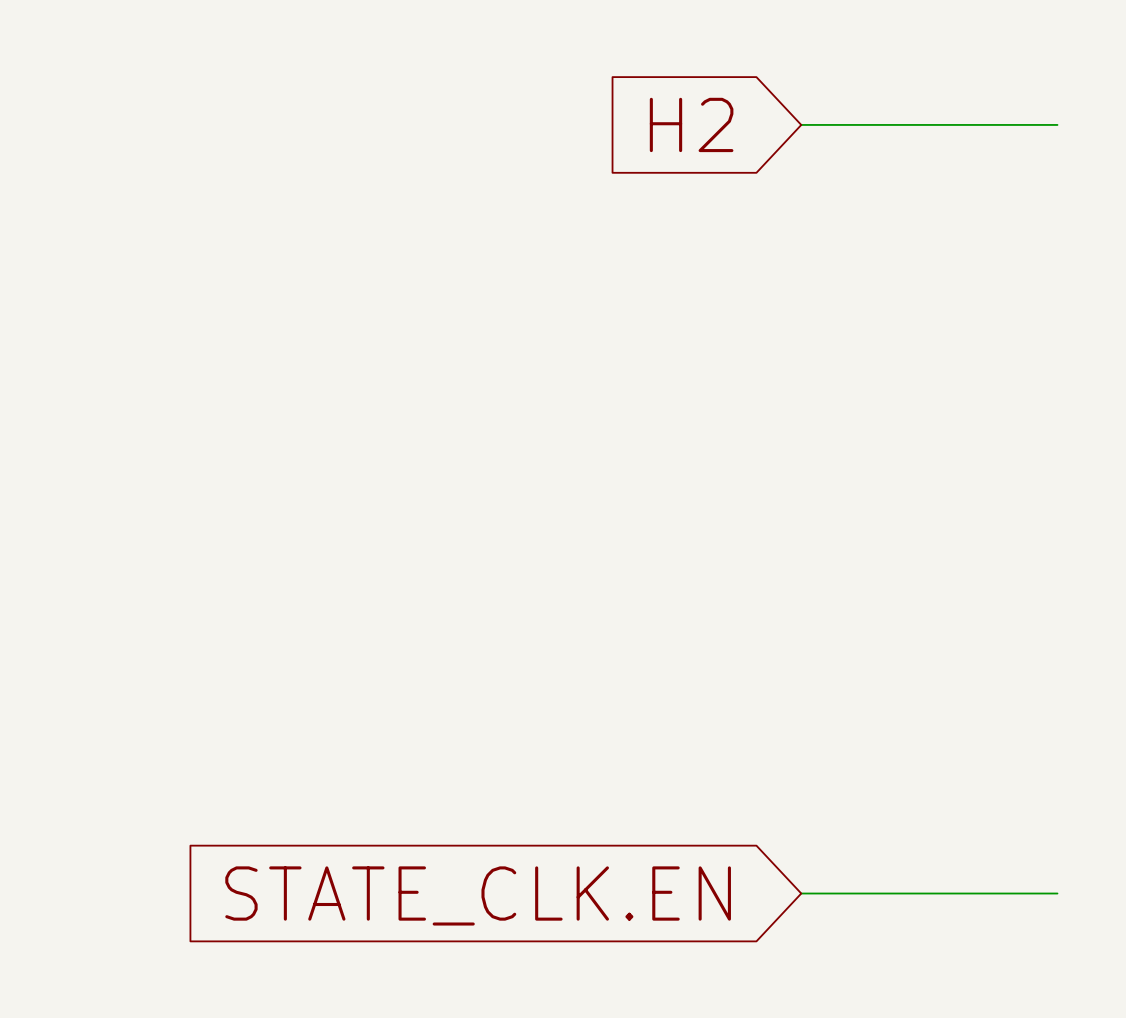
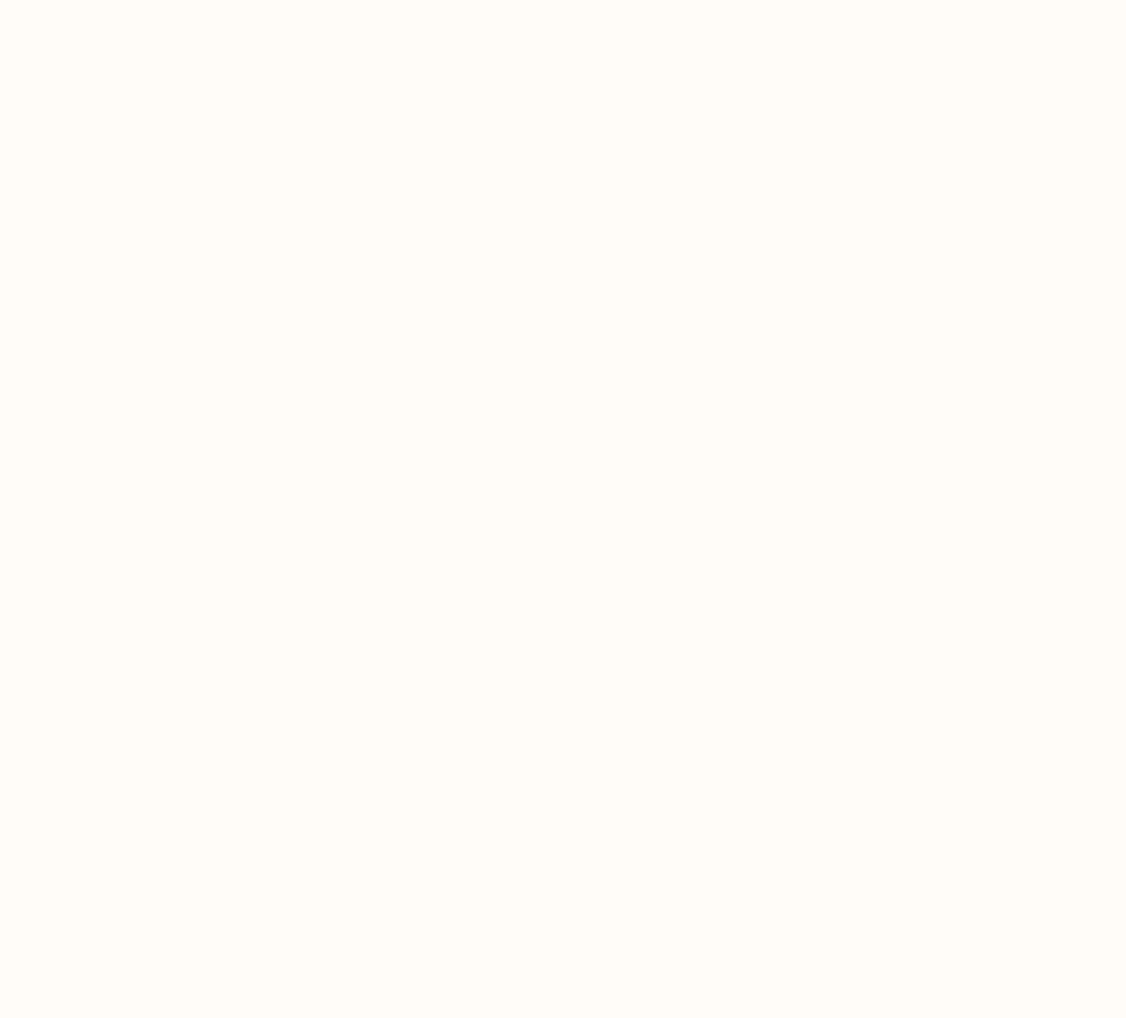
global label: H2 (691, 124) -> none
wire: (801, 124) (1057, 124) -> none
wire: (801, 893) (1057, 893) -> none
global label: STATE_CLK.EN (478, 895) -> none

